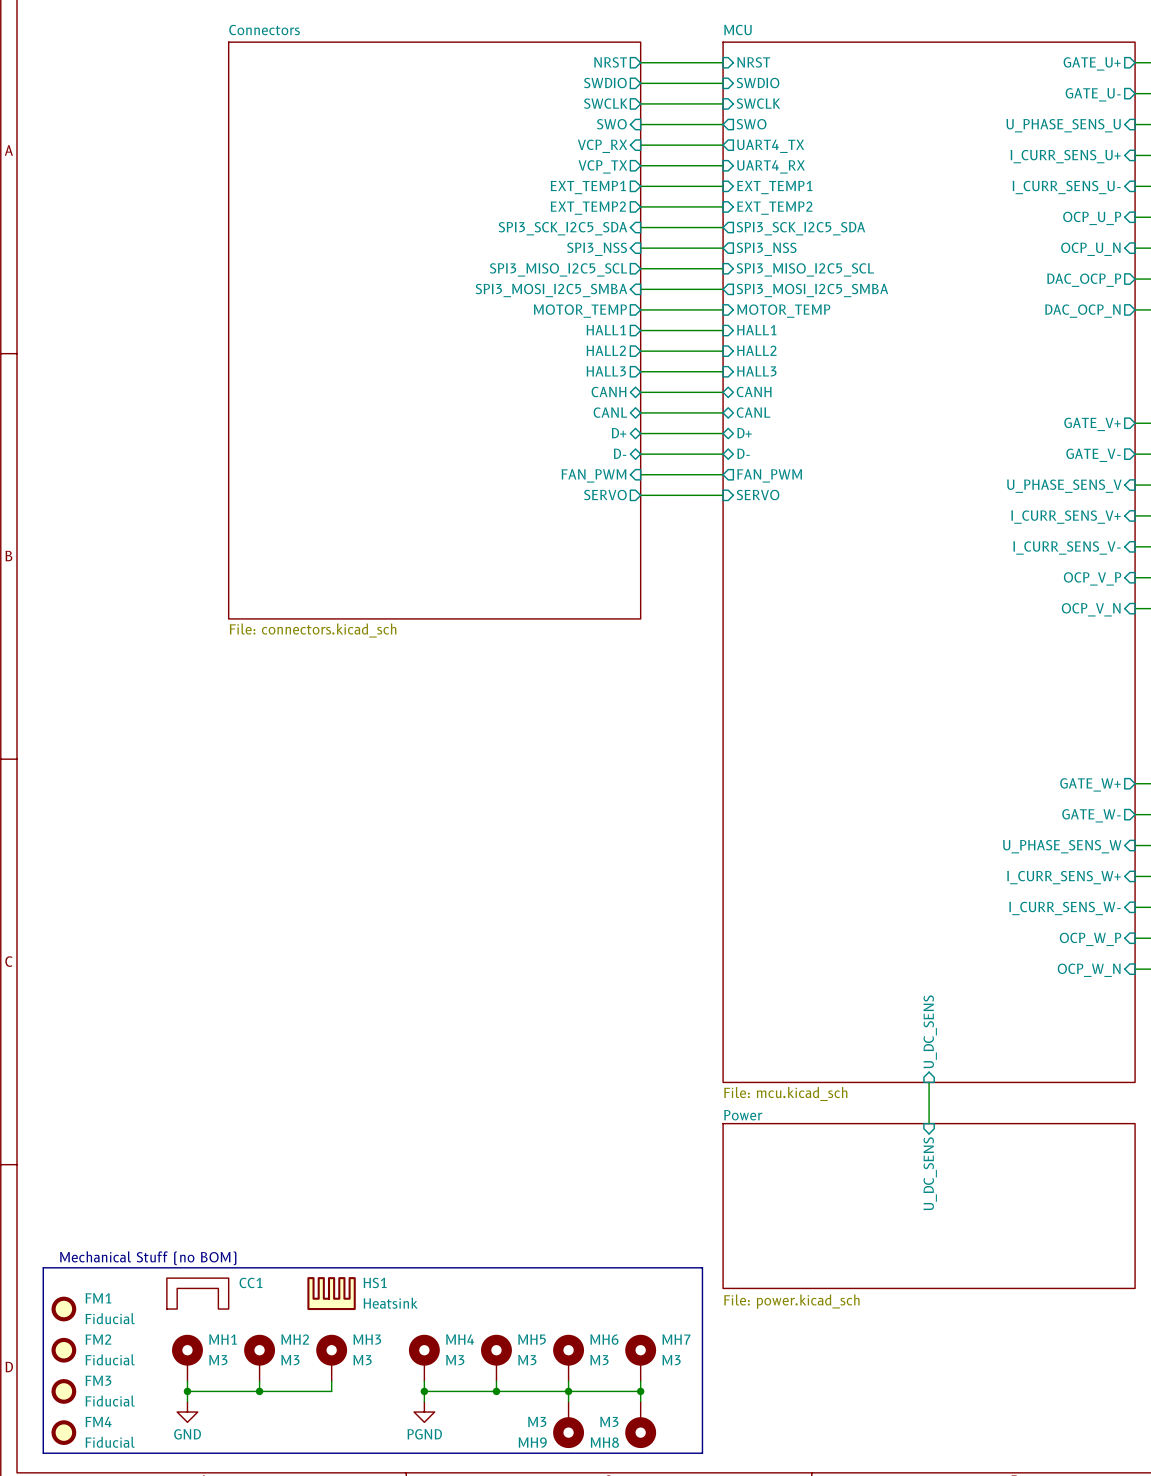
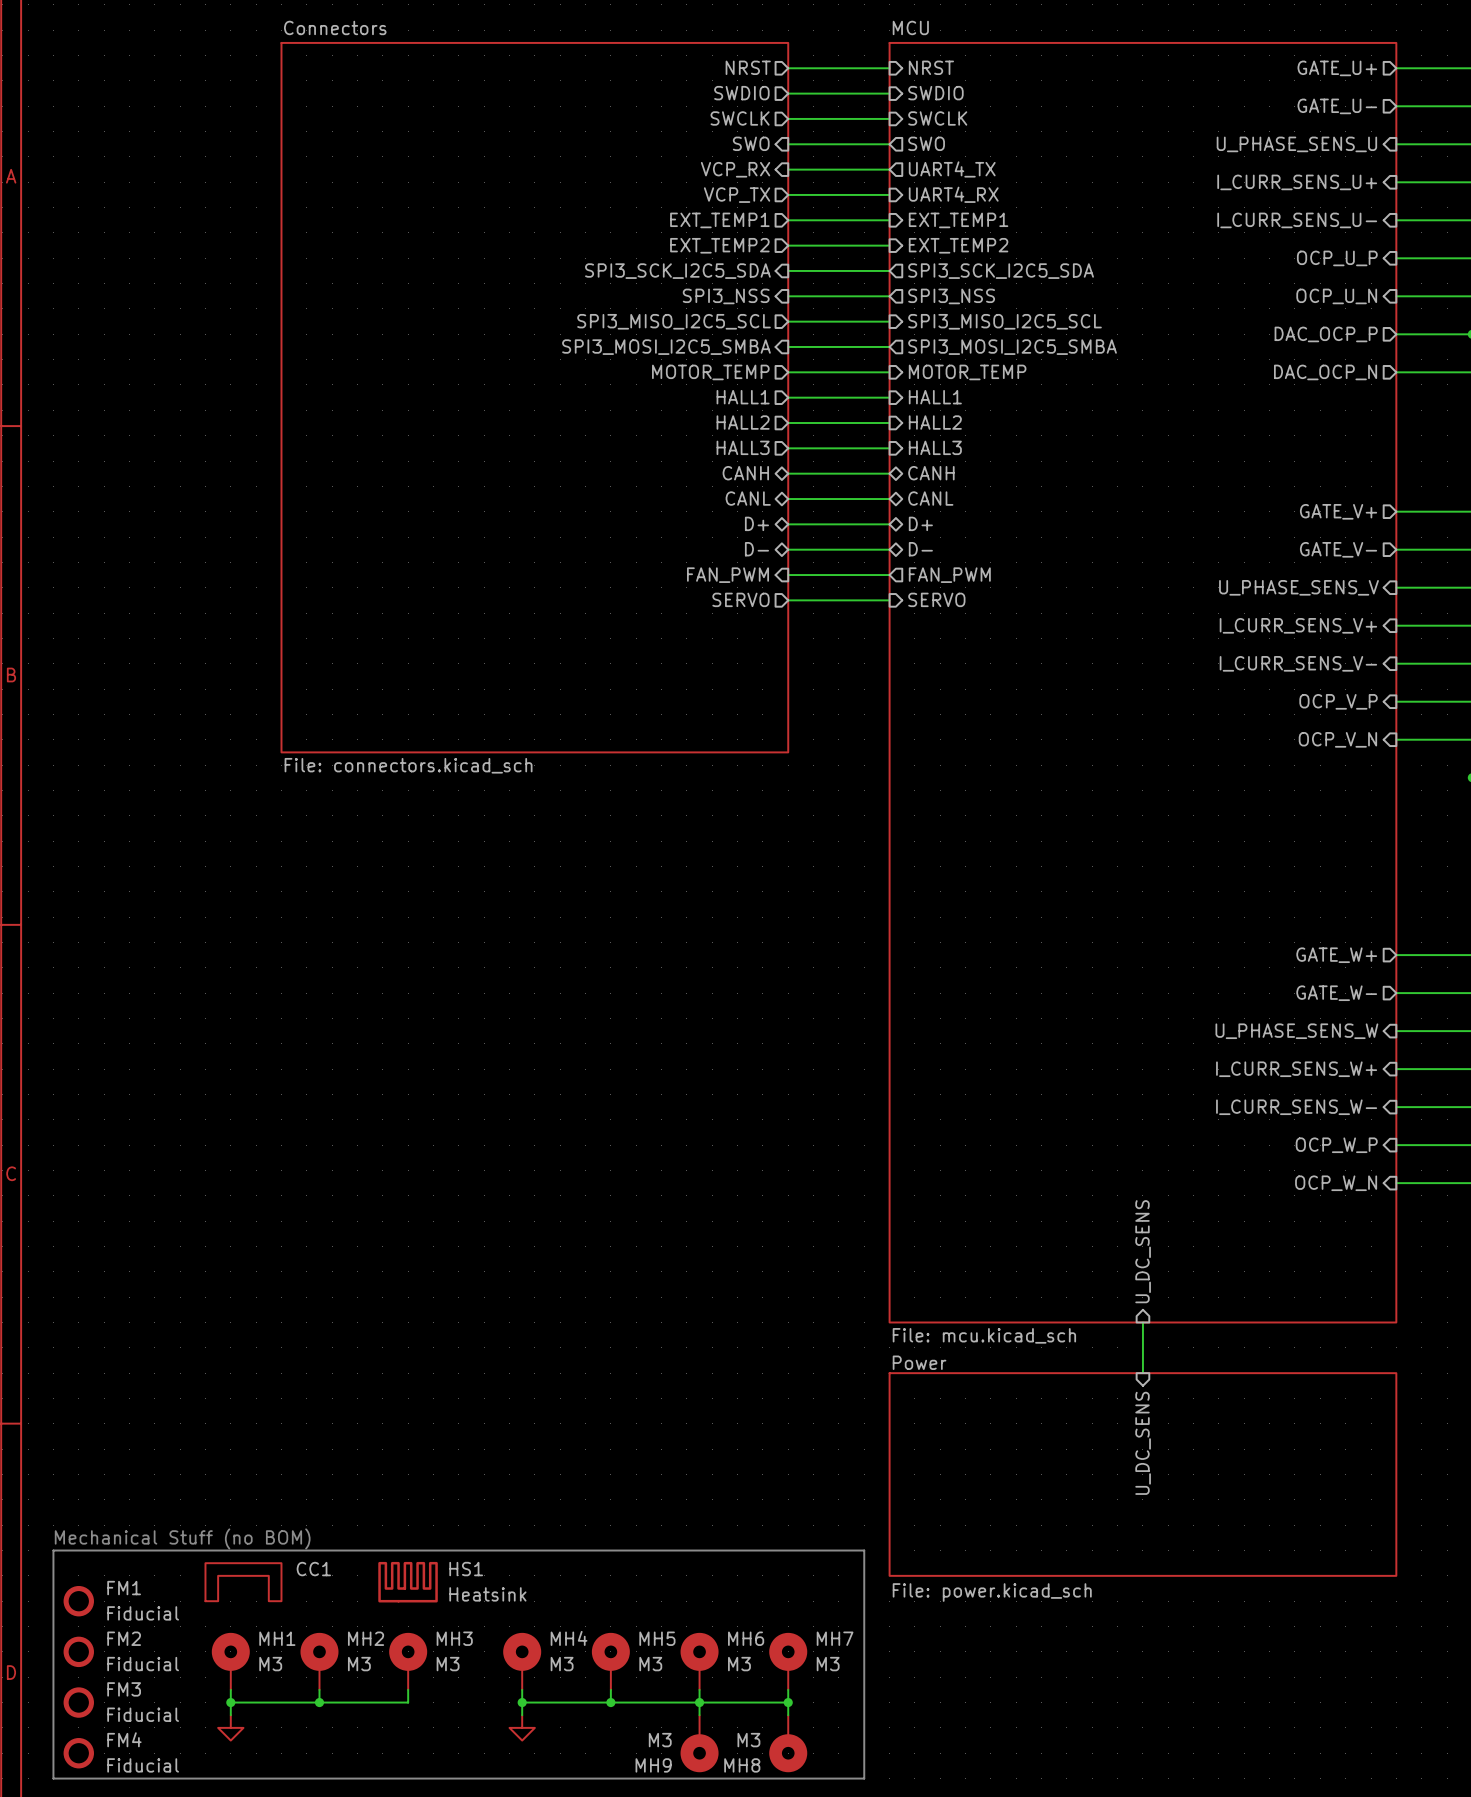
power symbol text: GND (187, 1434) -> none
power symbol text: PGND (424, 1434) -> none

